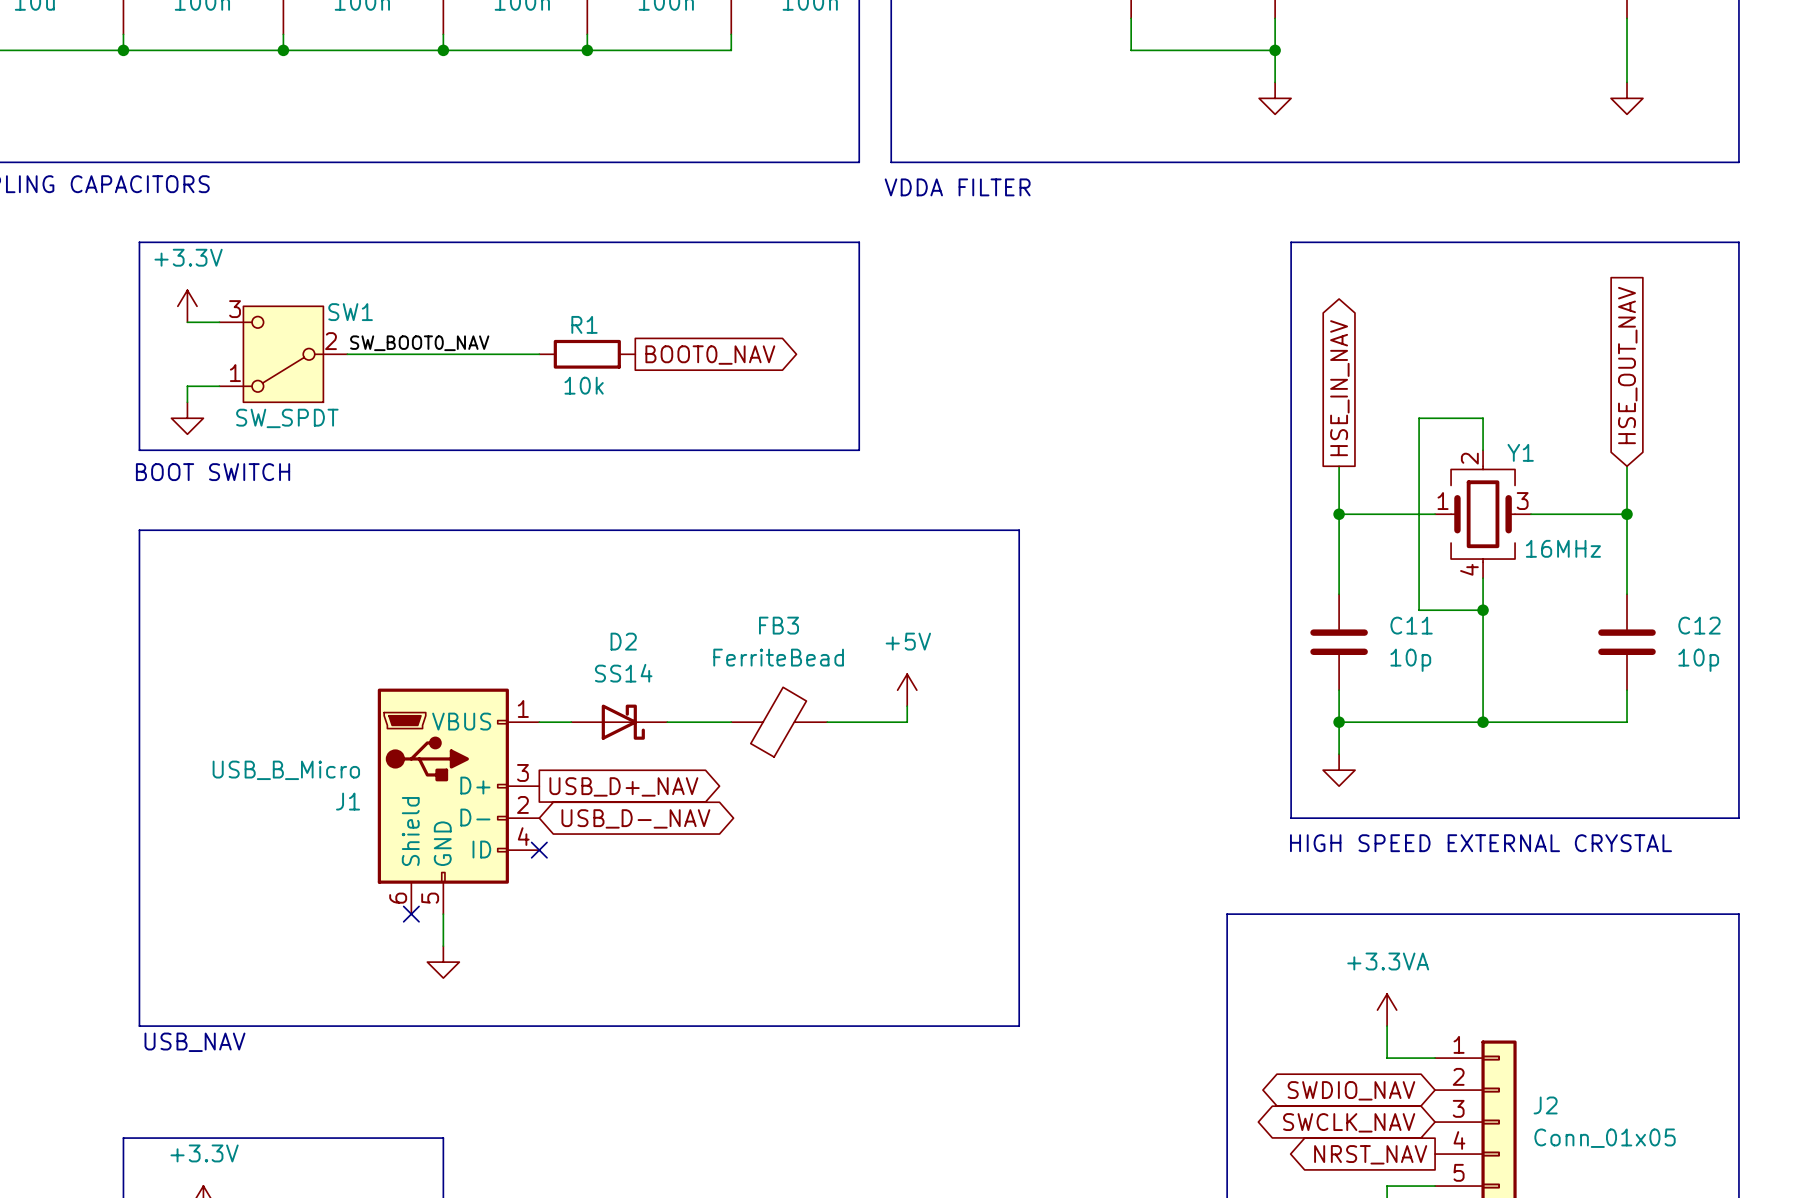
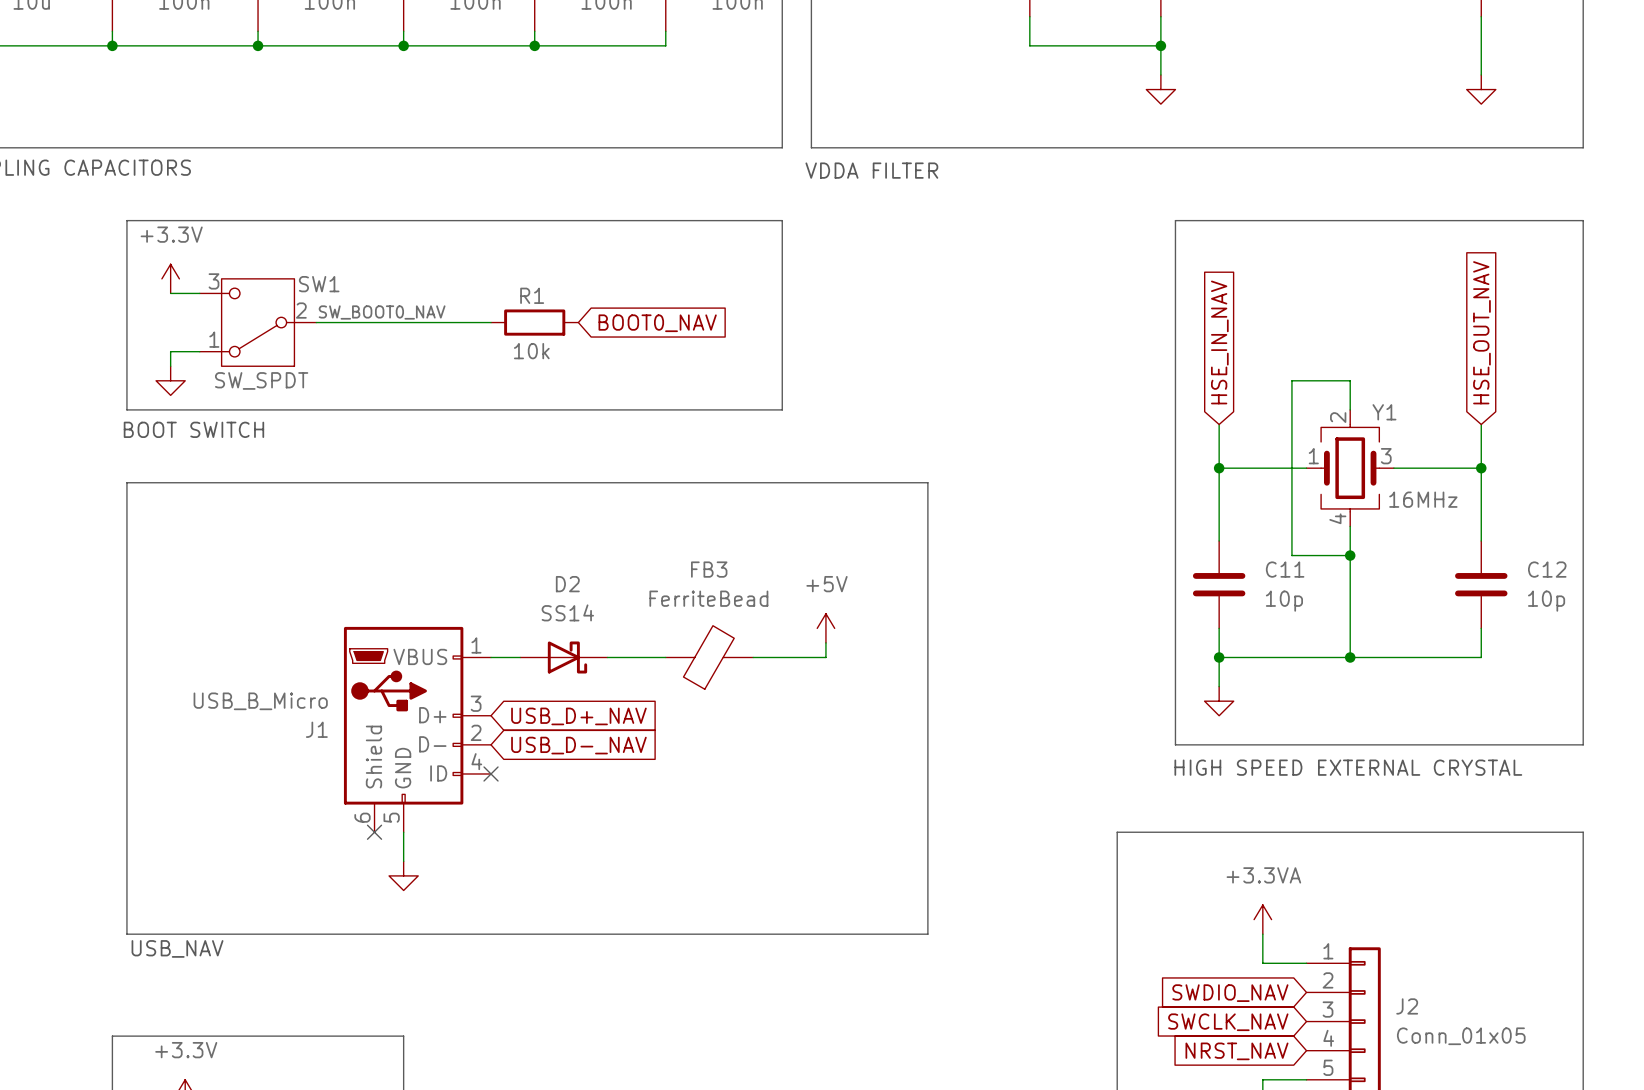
global label shape: output (710, 355) -> input (657, 323)
global label shape: output (1339, 388) -> input (1219, 342)
global label shape: output (623, 786) -> input (578, 716)
global label shape: bidirectional (635, 818) -> input (578, 745)
global label shape: bidirectional (1351, 1090) -> input (1230, 993)
global label shape: bidirectional (1349, 1122) -> input (1228, 1022)
global label shape: output (1370, 1154) -> input (1236, 1051)

